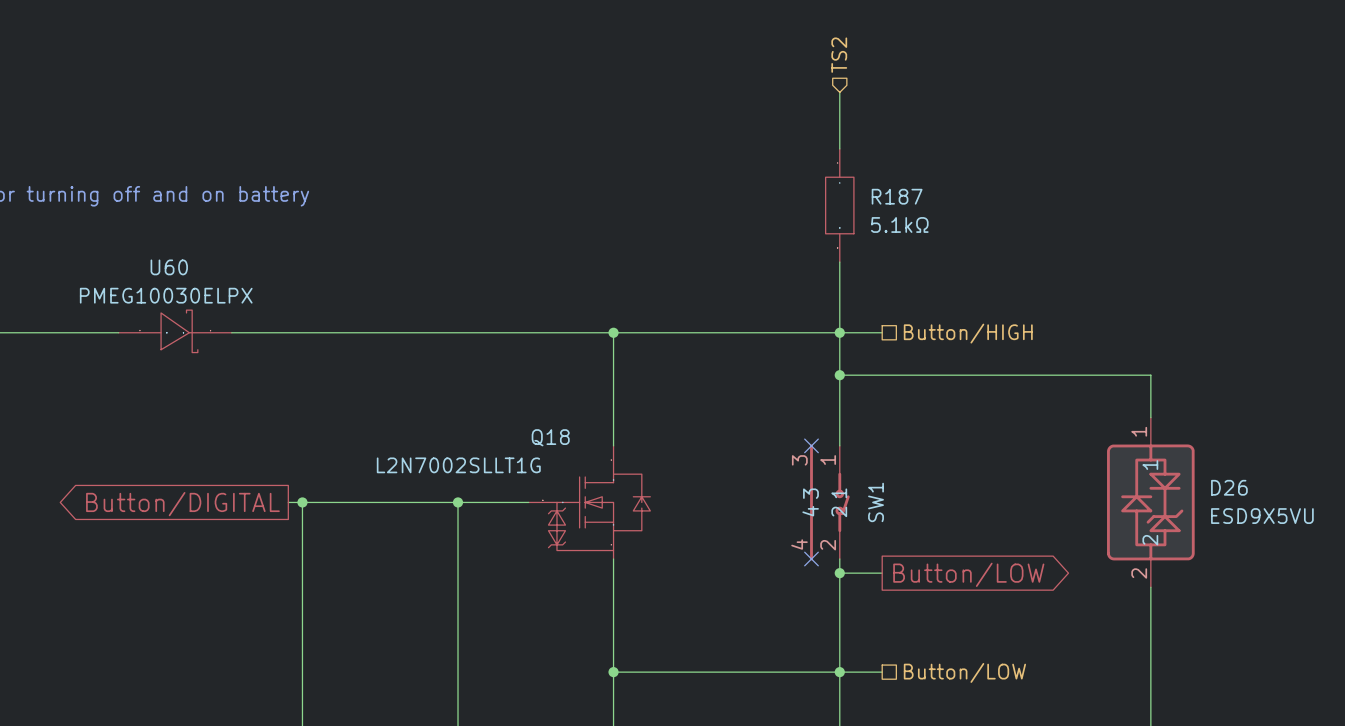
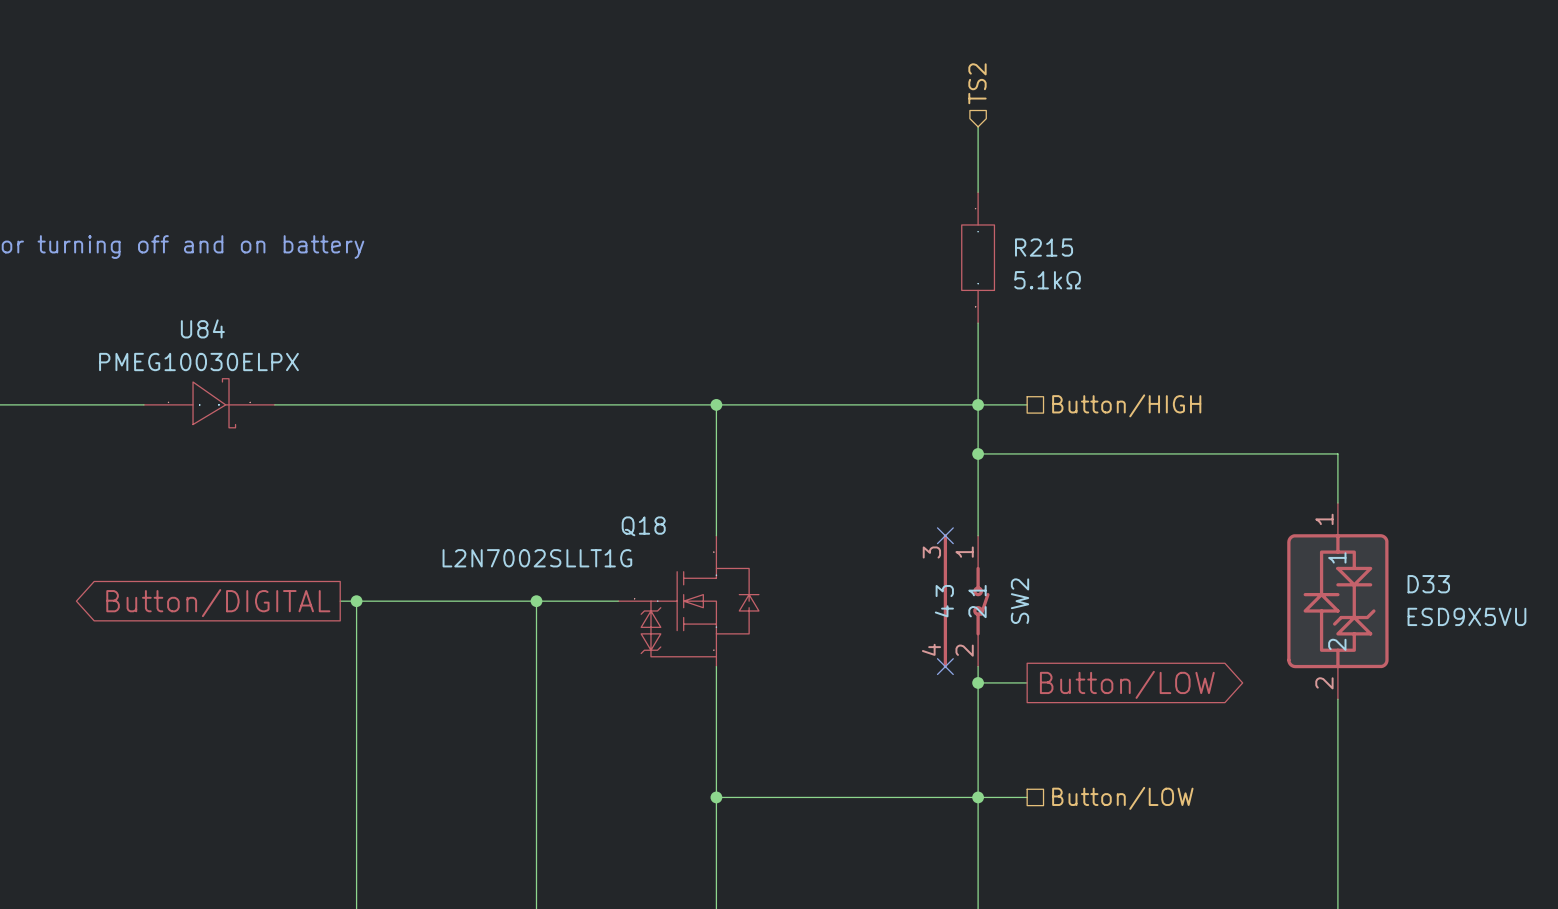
R187 name: R187 (897, 196) -> R215 (1044, 247)
U60 name: U60 (169, 267) -> U84 (202, 328)
D26 name: D26 (1229, 487) -> D33 (1428, 584)
SW1 name: SW1 (876, 502) -> SW2 (1020, 601)

